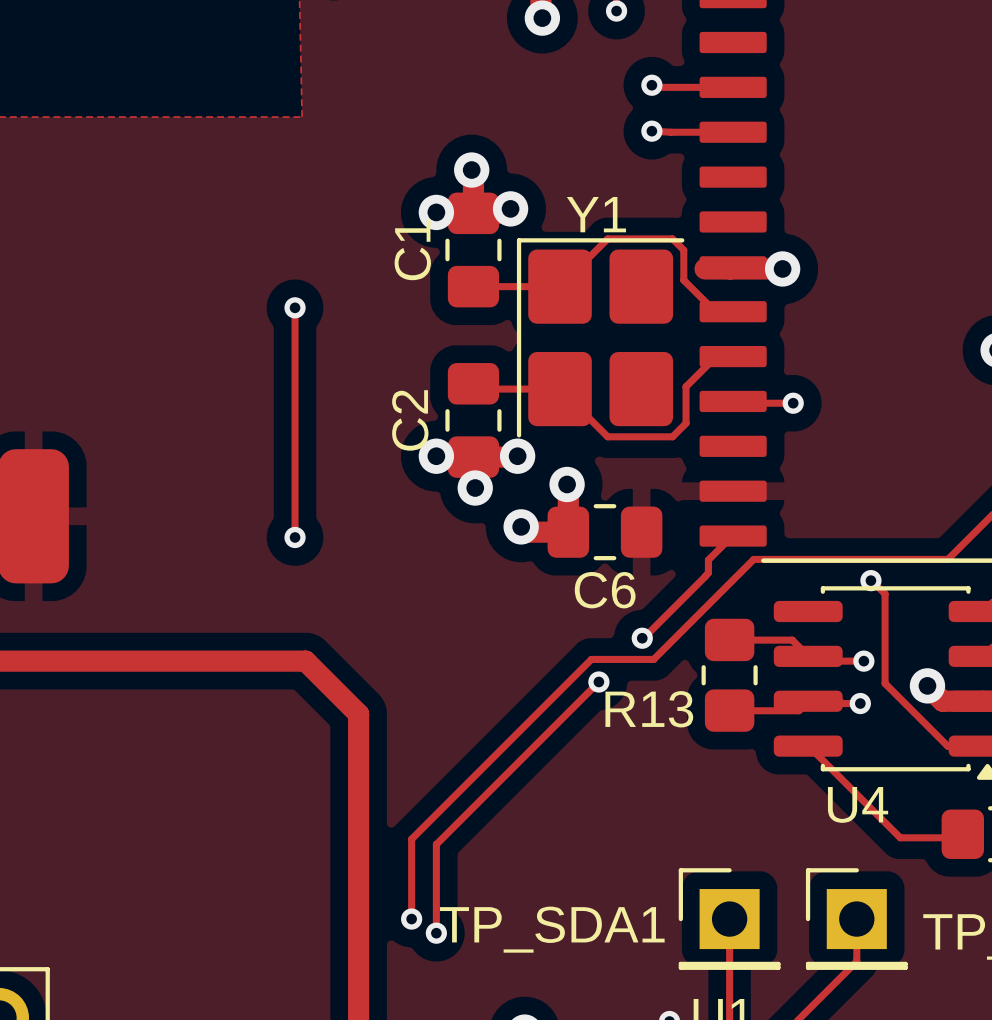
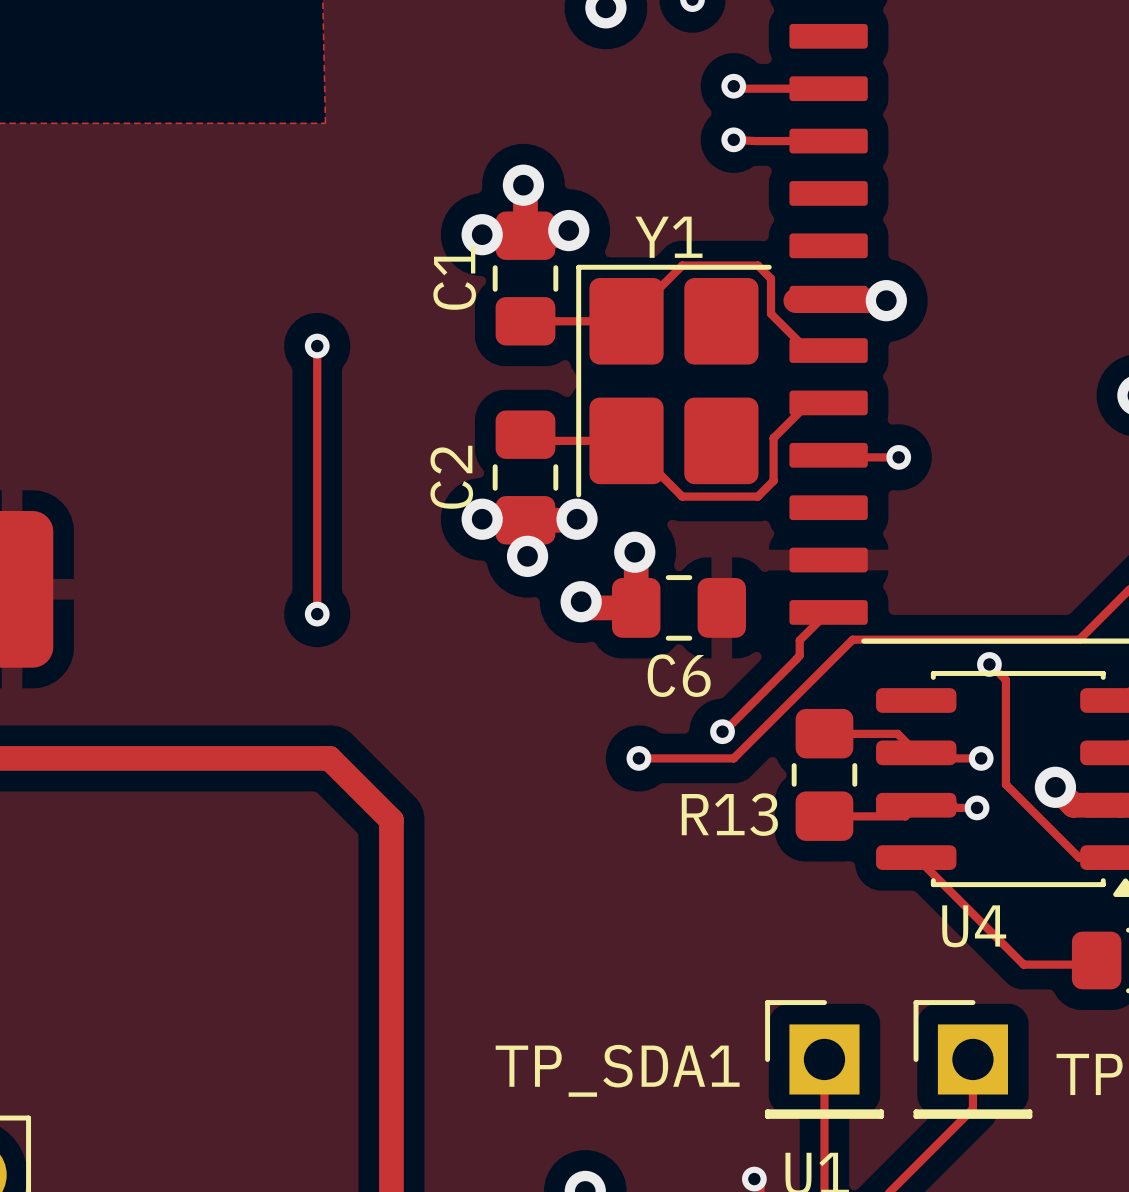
track: (753, 559) (653, 659) (591, 659) (411, 839) (411, 919) -> (852, 639) (733, 758) (638, 758)
track: (595, 678) (598, 681) (436, 844) (436, 933) -> none
via position: (598, 681) -> (638, 758)
via: (411, 919) -> none
via: (436, 933) -> none

